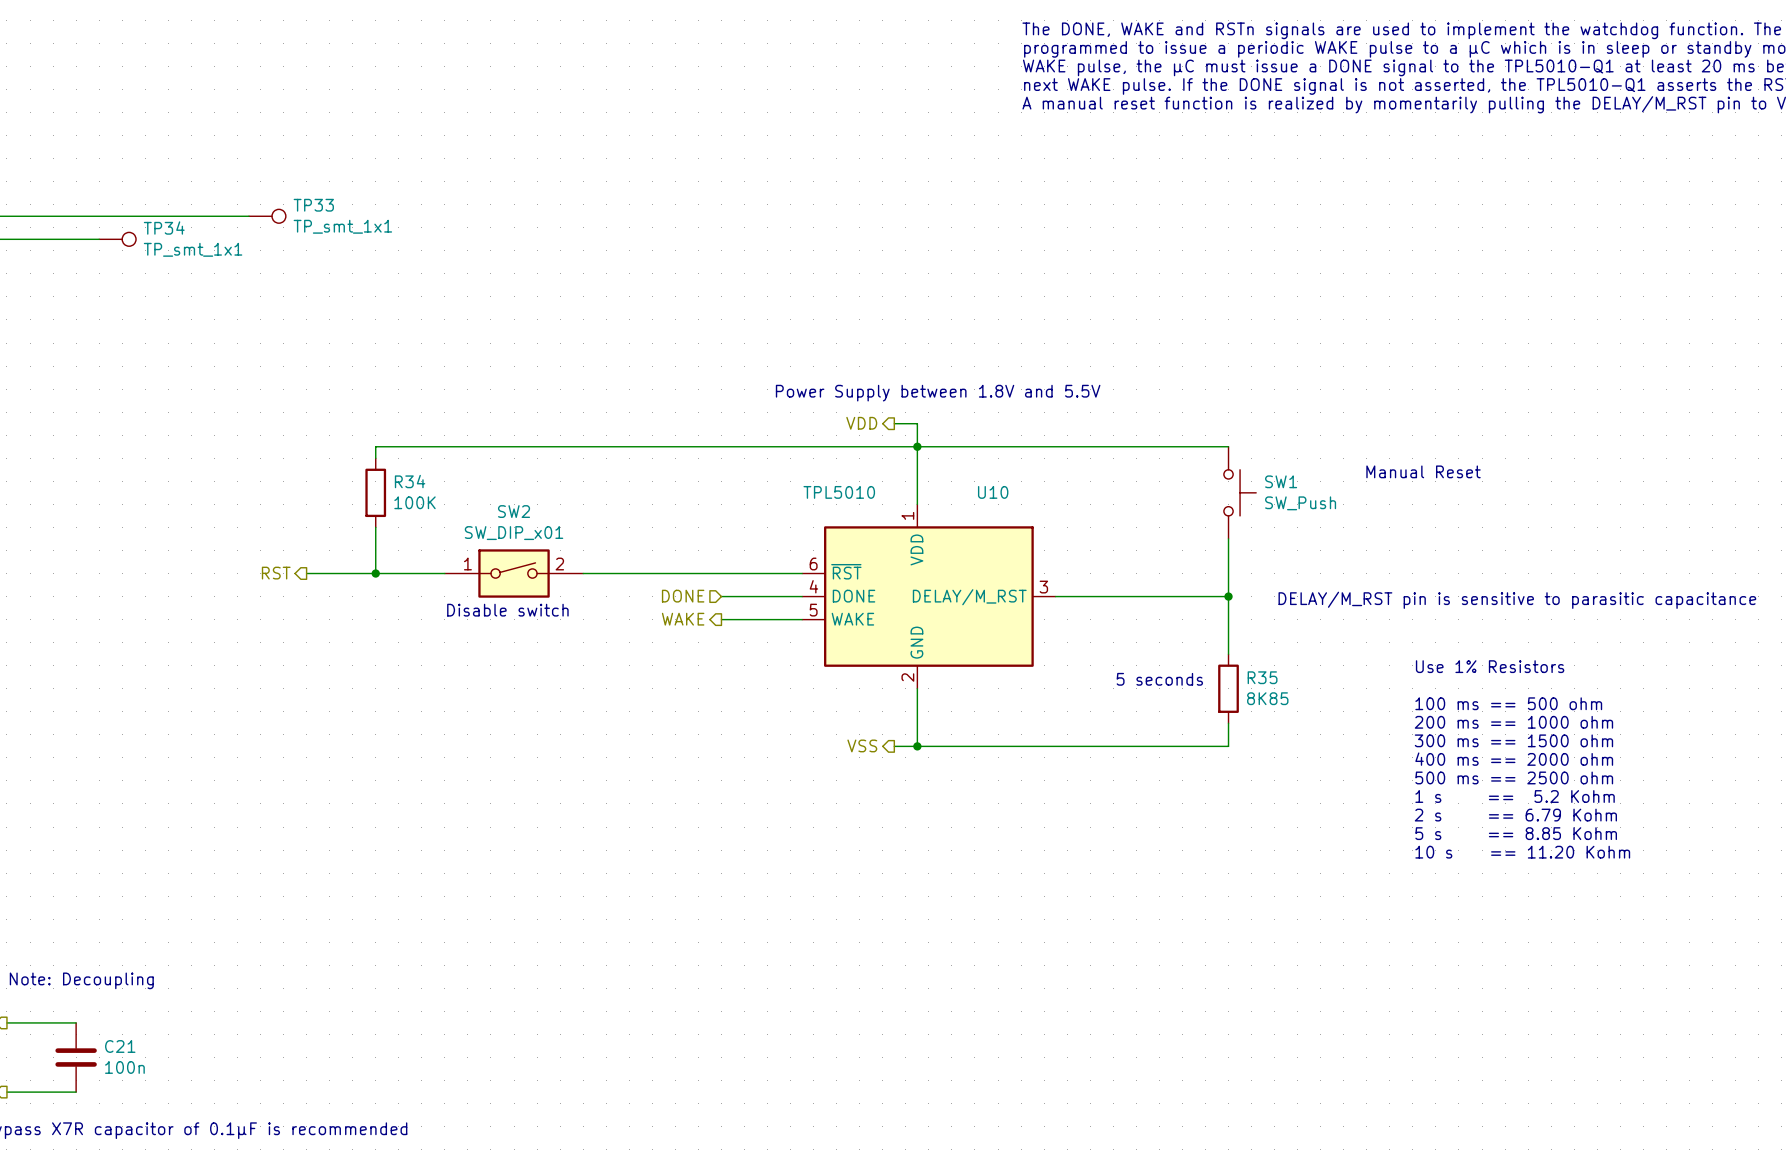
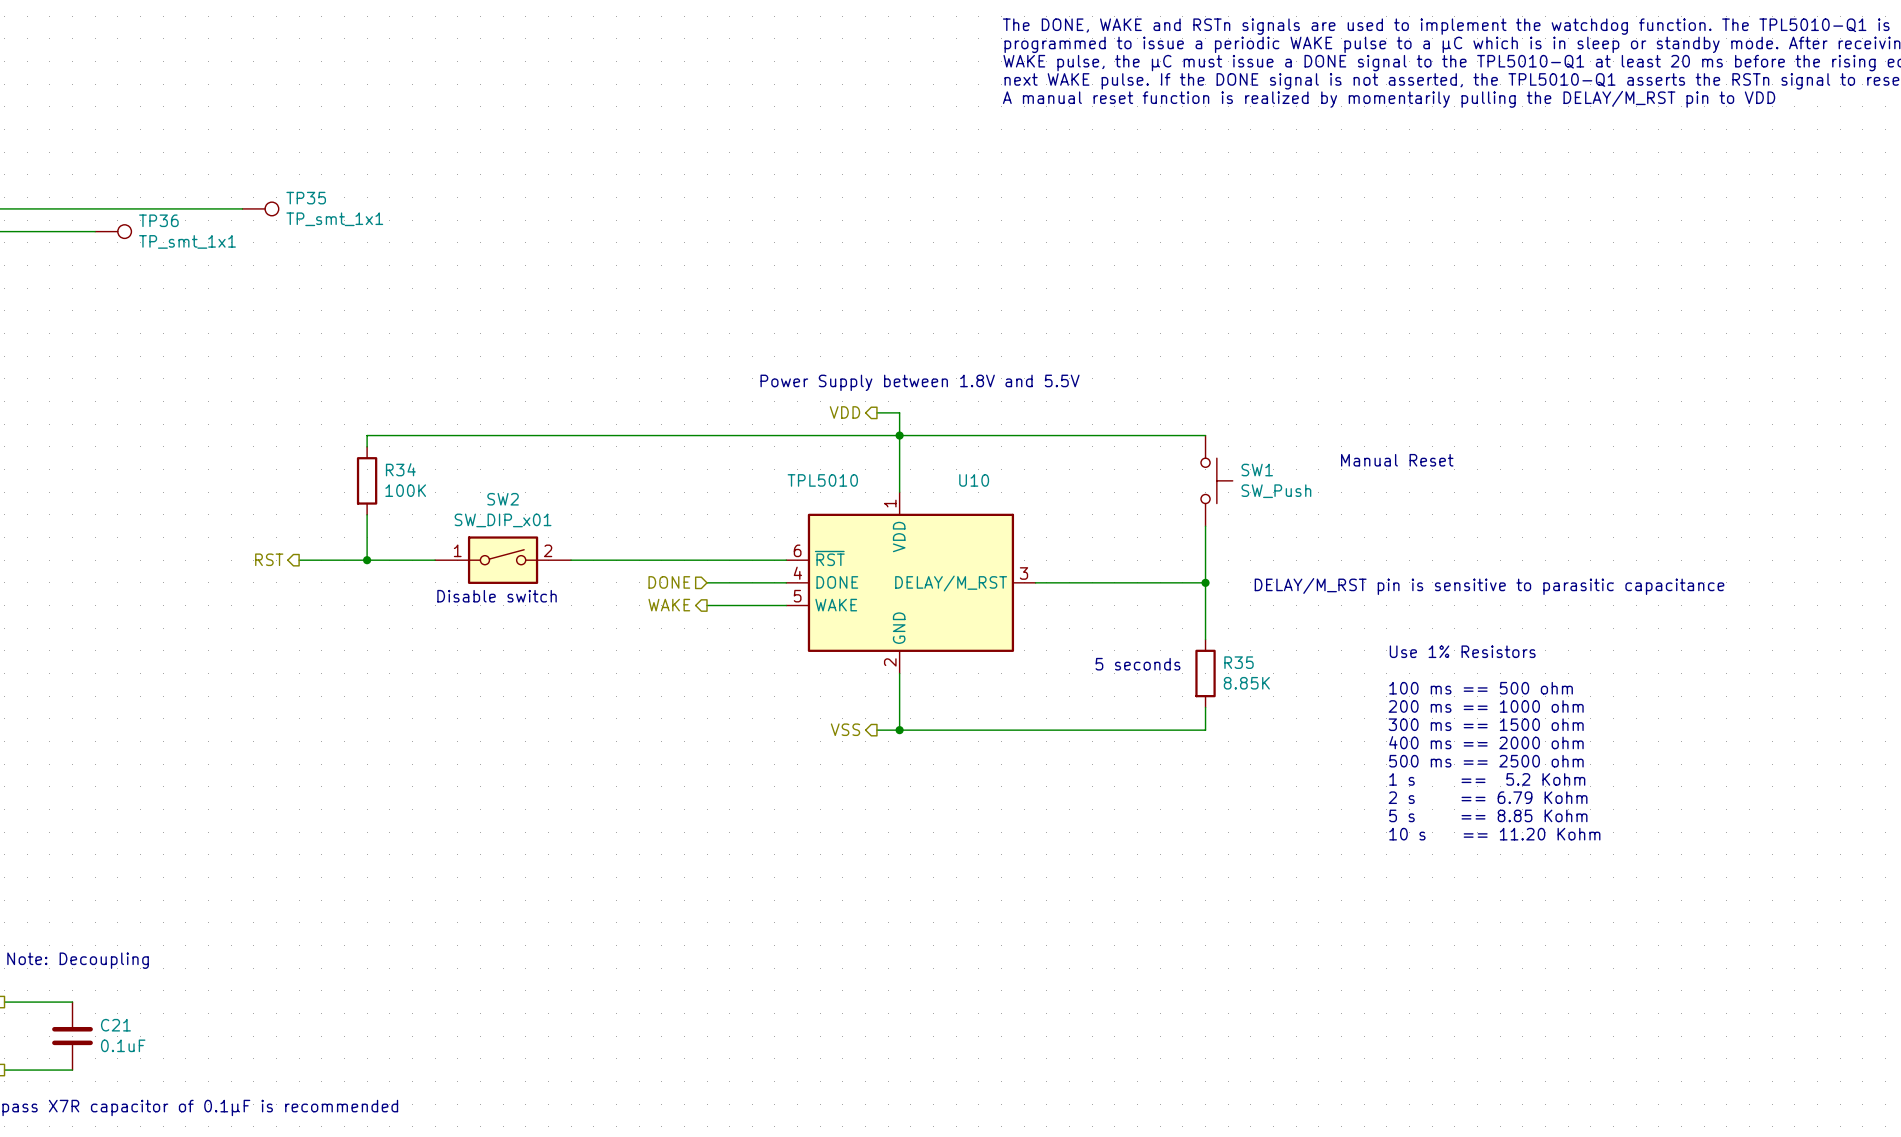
TP33 name: TP33 (313, 205) -> TP35 (306, 198)
TP34 name: TP34 (164, 228) -> TP36 (158, 220)
R35 value: 8K85 (1267, 698) -> 8.85K (1246, 683)
C21 value: 100n (124, 1067) -> 0.1uF (123, 1045)

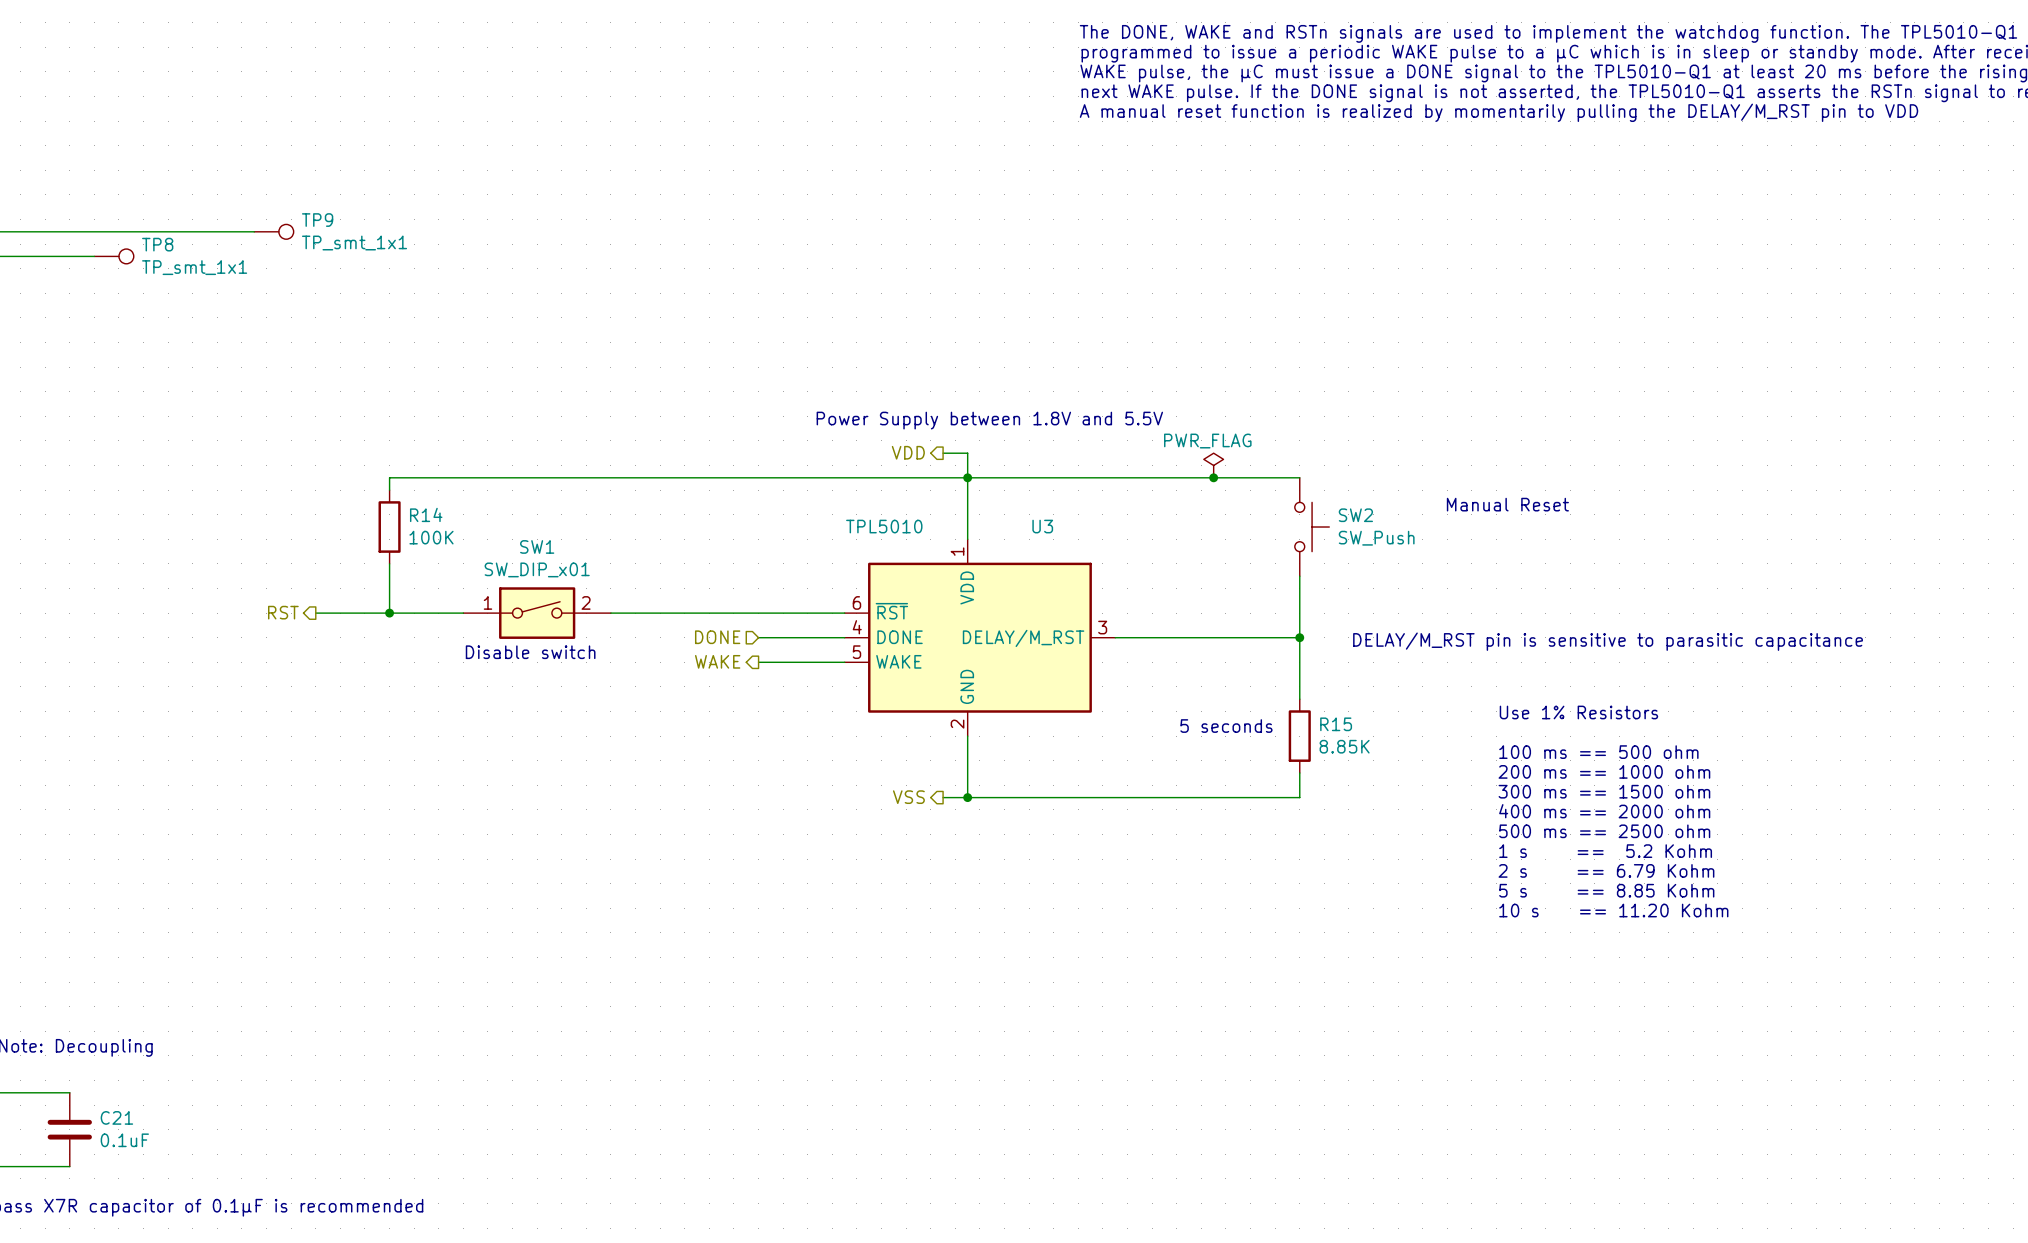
TP35 name: TP35 (306, 198) -> TP9 (317, 220)
TP36 name: TP36 (158, 220) -> TP8 (157, 244)
power symbol: none -> PWR_FLAG (1213, 465)
junction: none -> (1213, 477)
R34 name: R34 (400, 469) -> R14 (426, 514)
SW1 name: SW1 (1257, 470) -> SW2 (1355, 515)
U10 name: U10 (974, 480) -> U3 (1042, 526)
SW2 name: SW2 (503, 499) -> SW1 (537, 546)
R35 name: R35 (1239, 662) -> R15 (1336, 724)

